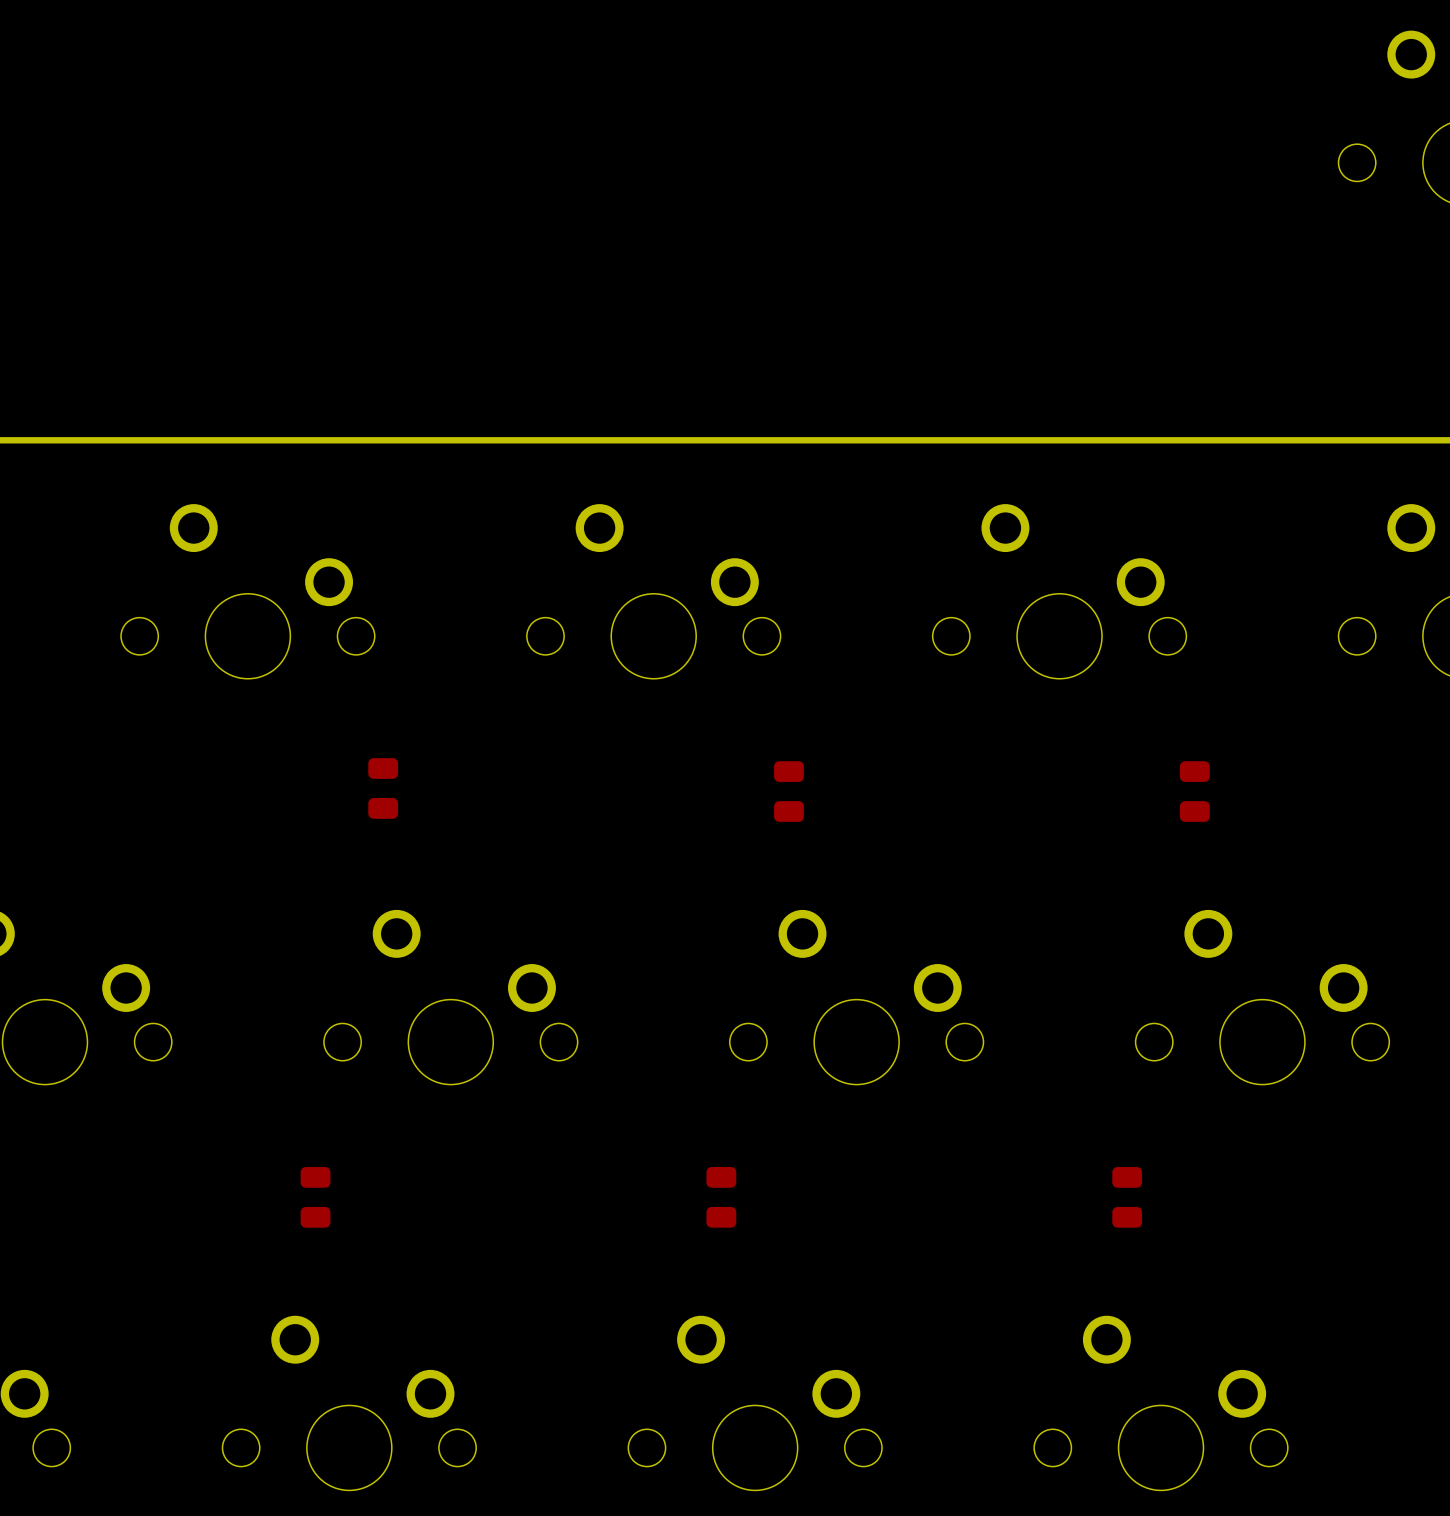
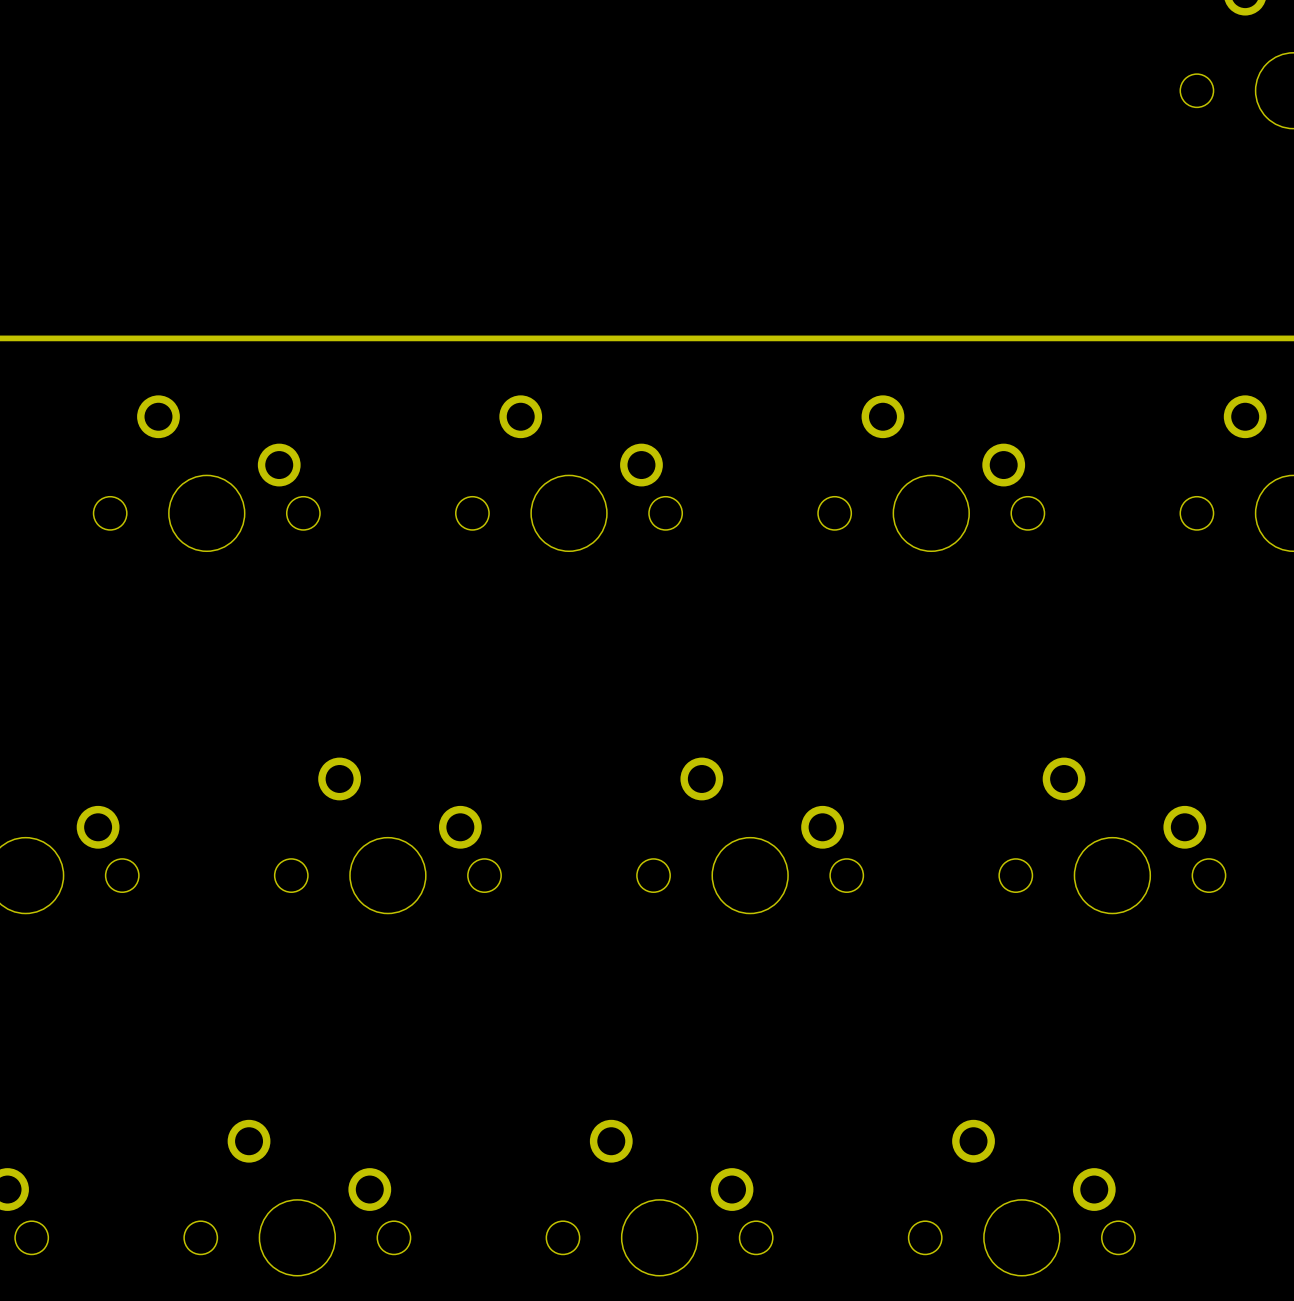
part: (383, 788) -> none
part: (788, 791) -> none
part: (1194, 791) -> none
part: (315, 1197) -> none
part: (721, 1197) -> none
part: (1127, 1197) -> none

